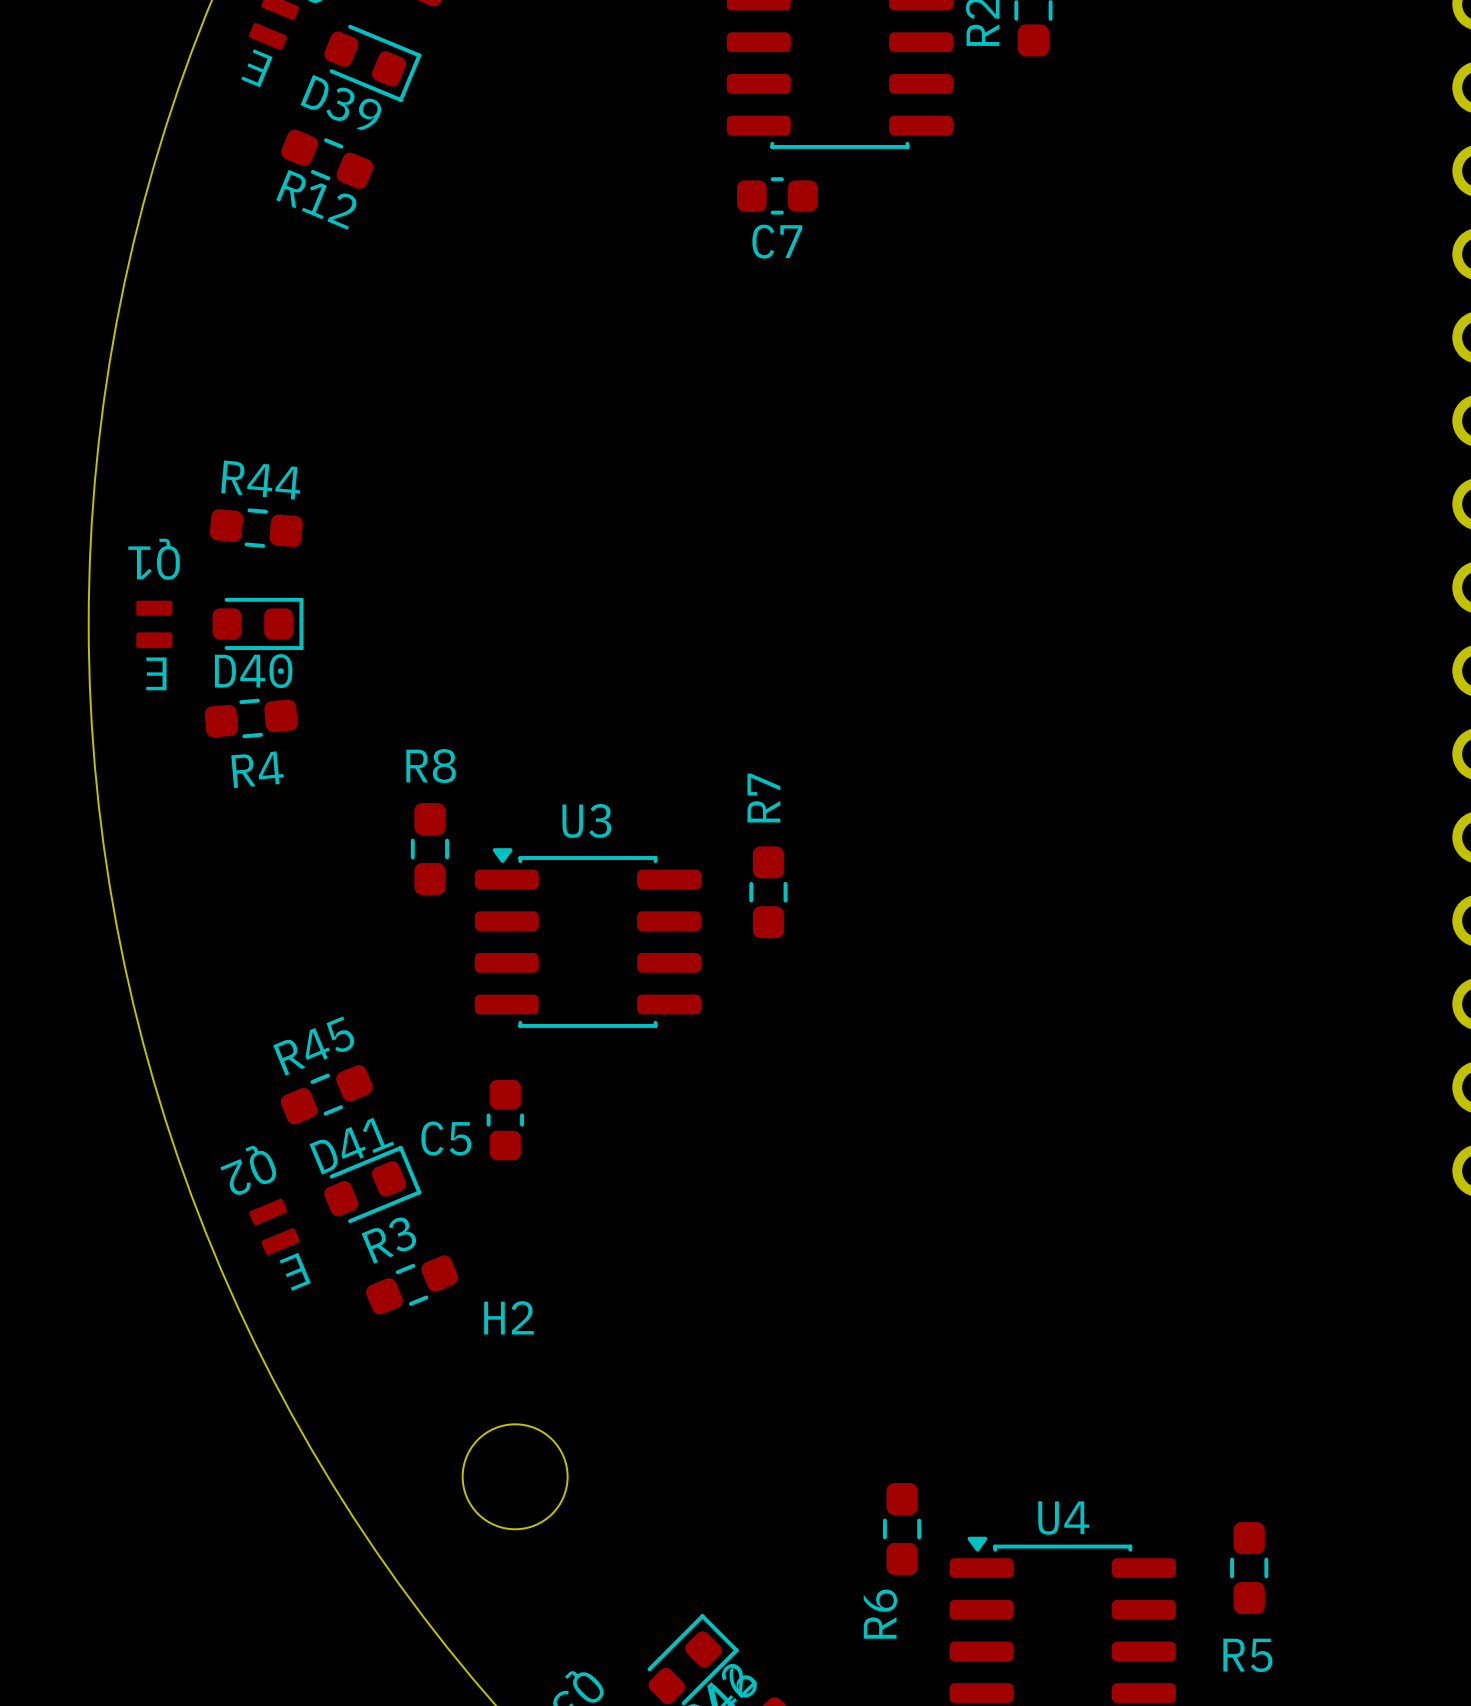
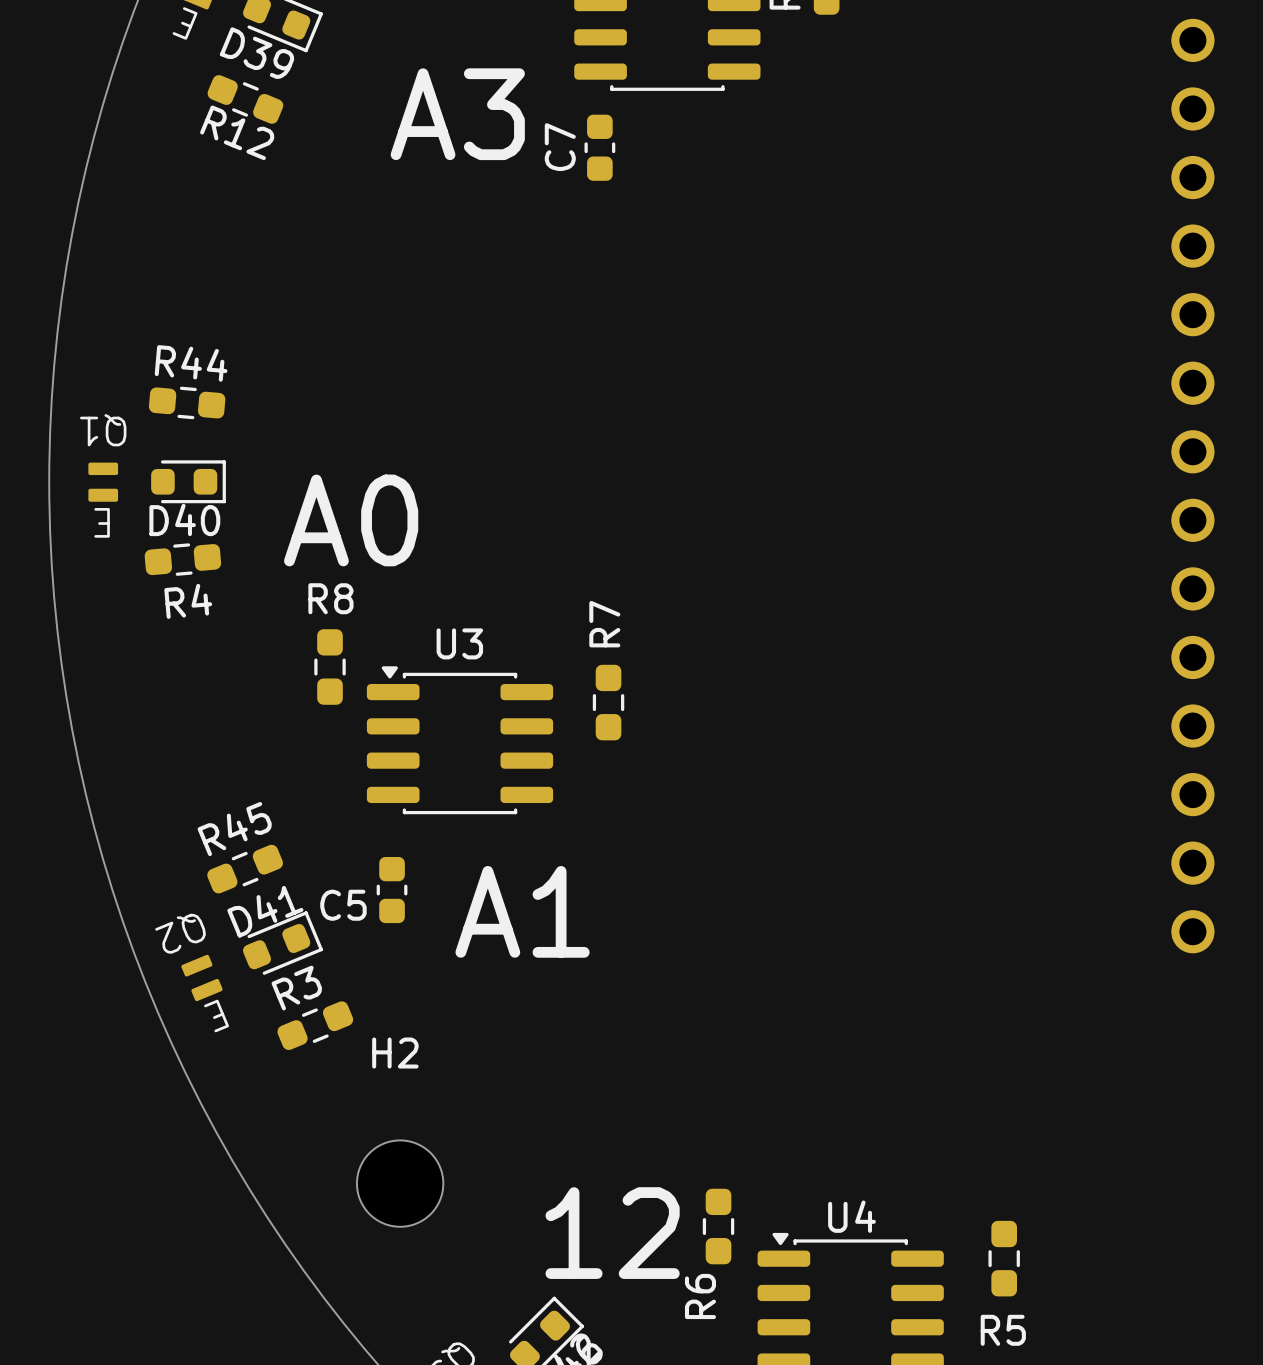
text: none -> A3 (457, 114)
C7 rotation: 0° (777, 195) -> 90° clockwise (599, 147)
text: none -> A0 (351, 520)
text: none -> A1 (522, 911)
text: none -> 12 (612, 1233)

